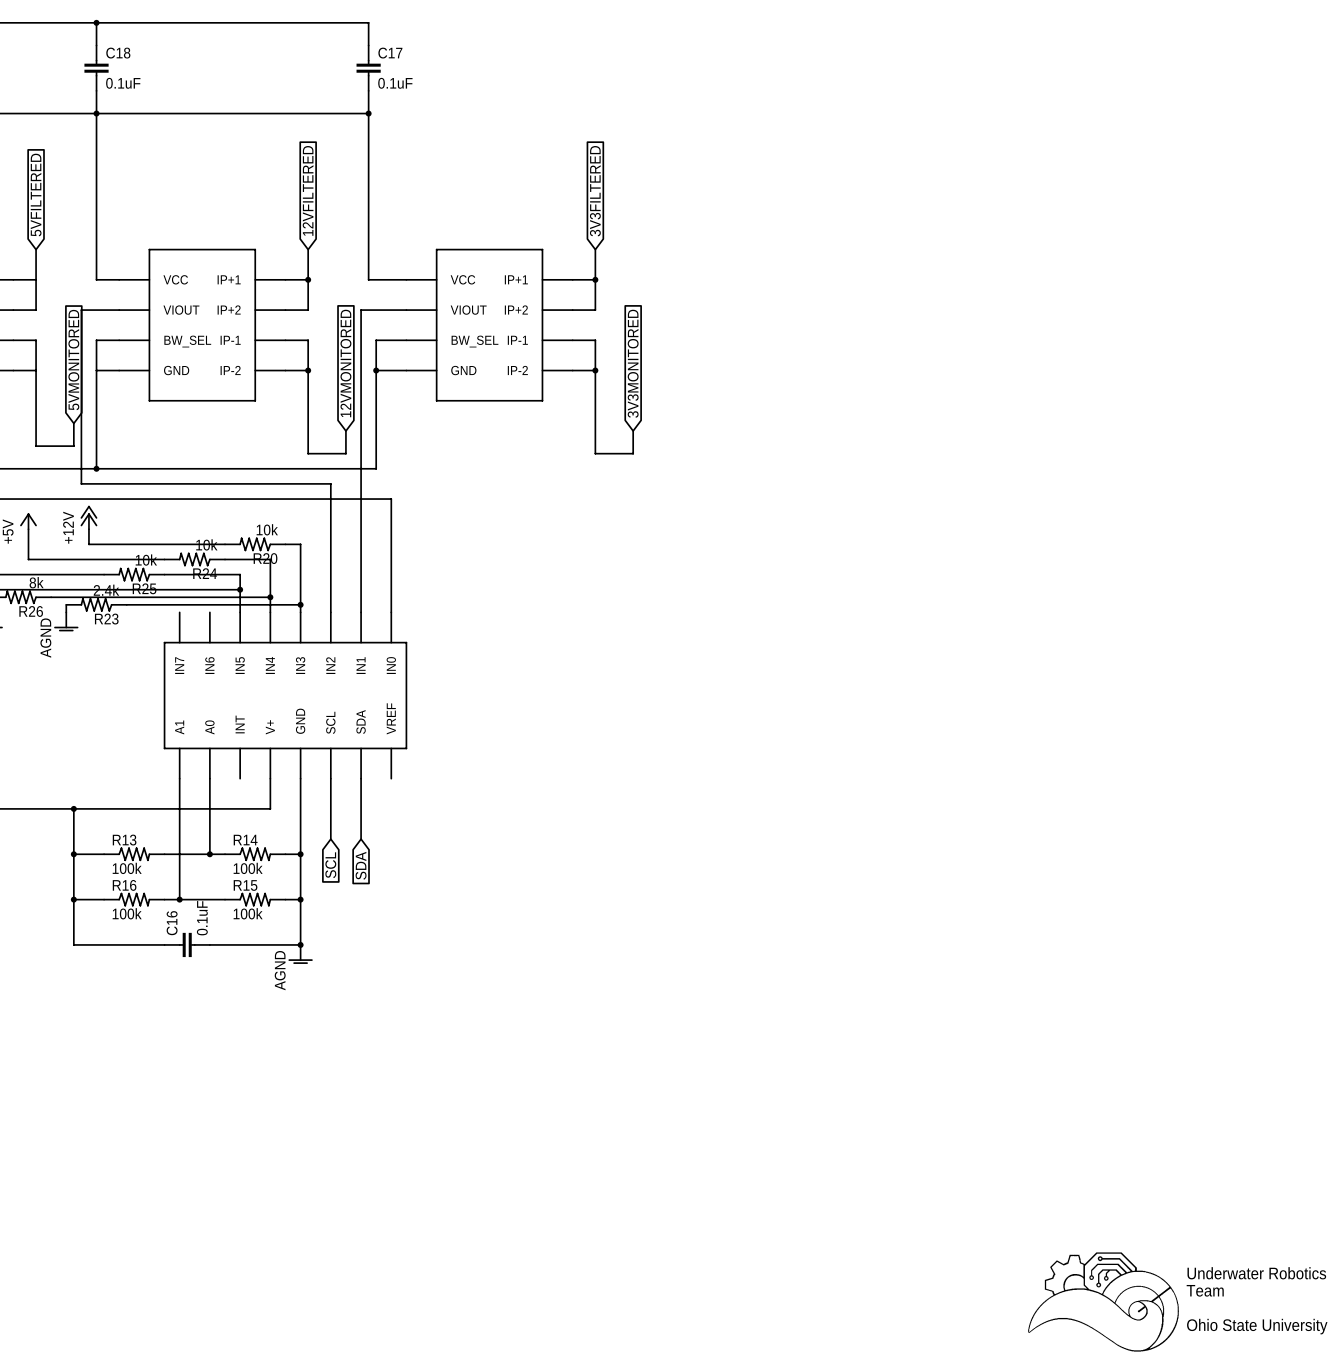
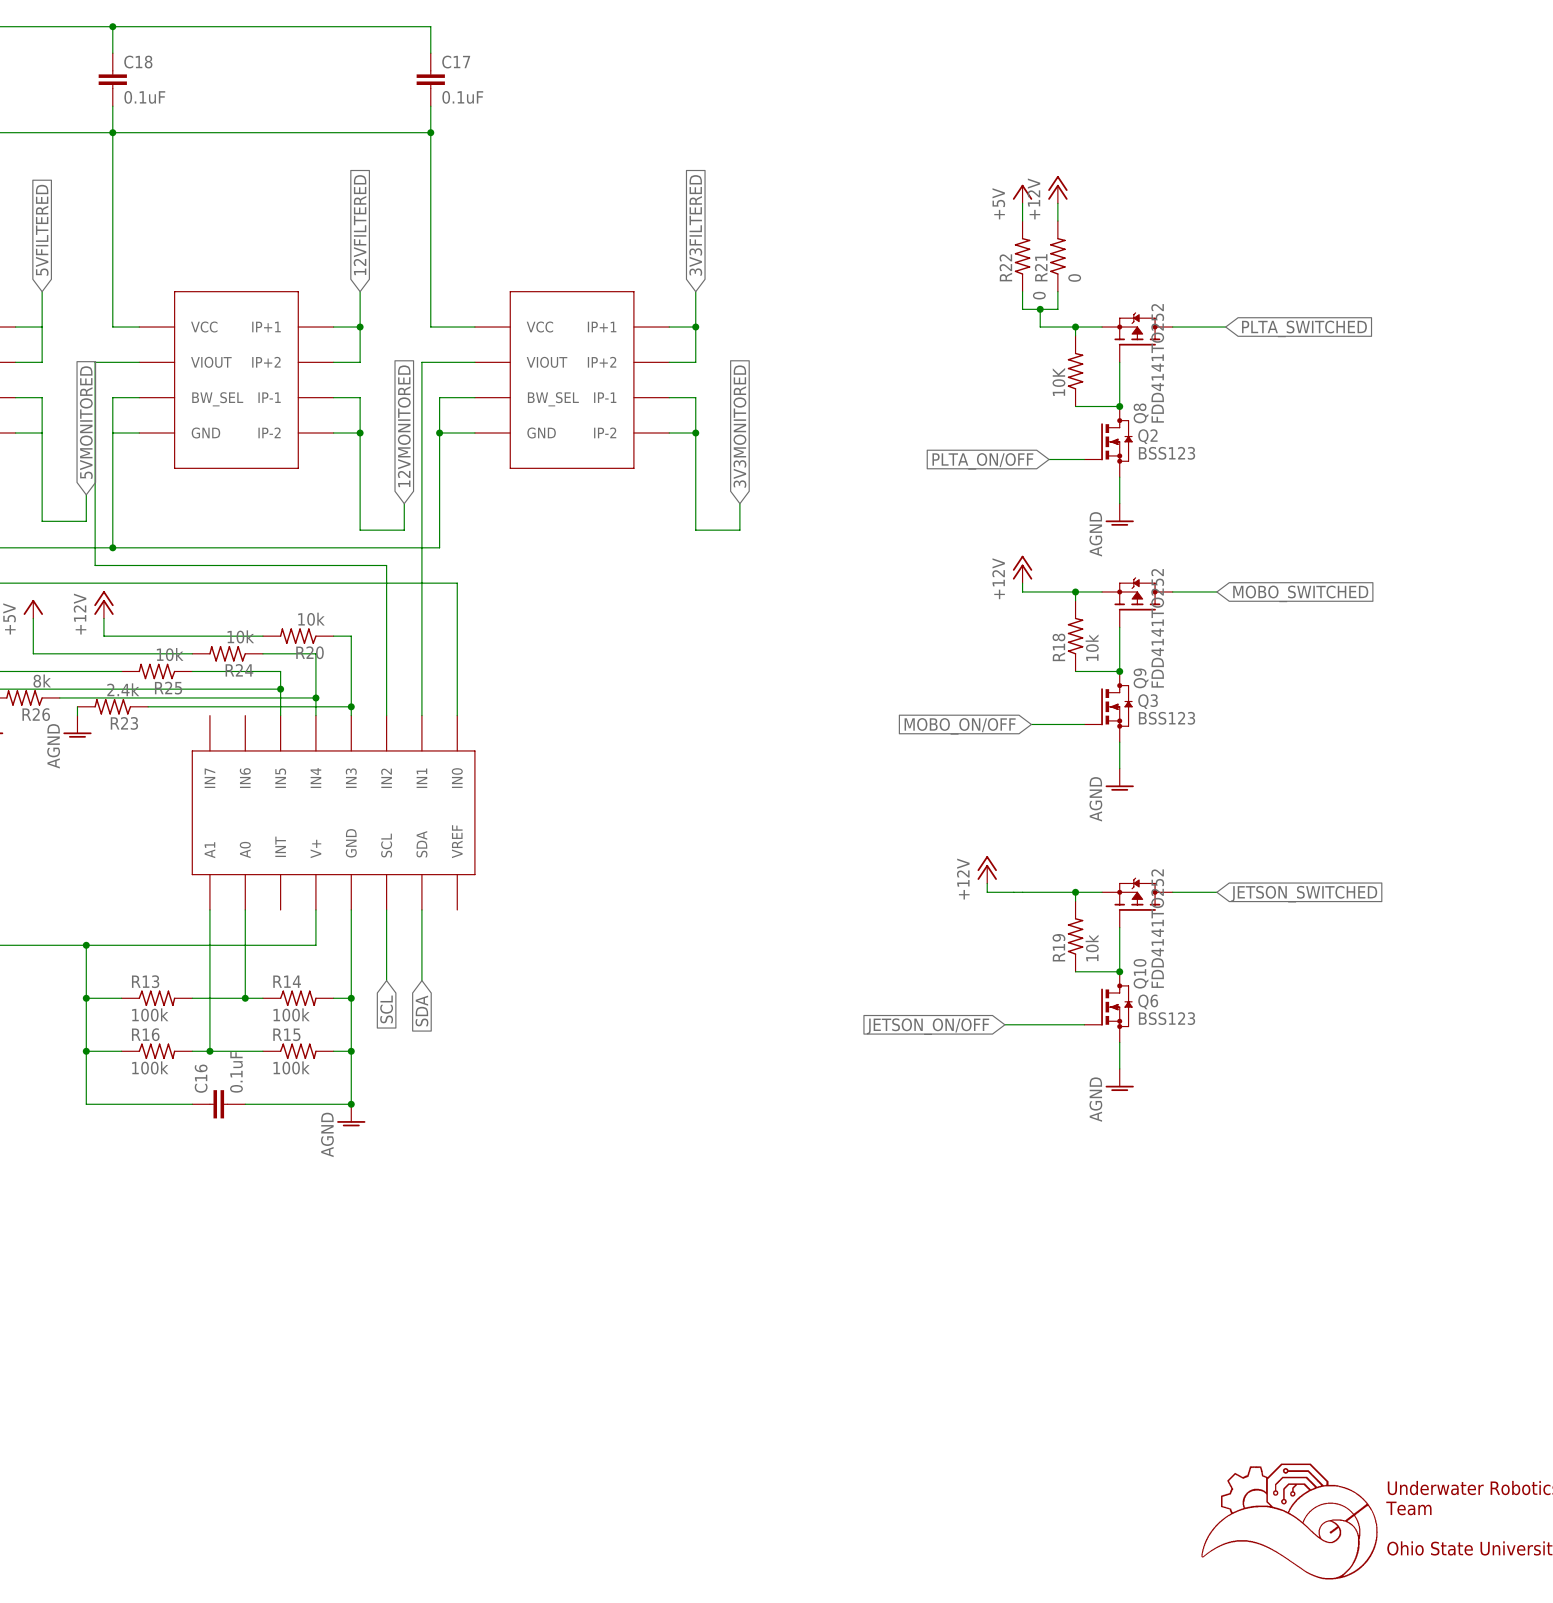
power symbol: none -> +12V (1057, 189)
power symbol: none -> +5V (1022, 194)
wire: none -> (1022, 203) (1022, 221)
wire: none -> (1057, 203) (1057, 221)
R22: none -> 0 (1022, 256)
R21: none -> 0 (1057, 256)
wire: none -> (1022, 291) (1022, 309) (1057, 309) (1057, 291)
wire: none -> (1040, 309) (1040, 327) (1102, 327)
junction: none -> (1040, 309)
wire: none -> (1075, 327) (1075, 335)
junction: none -> (1075, 327)
wire: none -> (1172, 327) (1225, 327)
global label: none -> PLTA_SWITCHED (1304, 328)
Q8: none -> FDD4141TO252 (1137, 337)
wire: none -> (1119, 362) (1119, 406) (1075, 406)
10K: none -> (1075, 371)
junction: none -> (1119, 406)
Q2: none -> BSS123 (1108, 441)
wire: none -> (1049, 459) (1084, 459)
global label: none -> PLTA_ON/OFF (982, 461)
wire: none -> (1119, 477) (1119, 503)
power symbol: none -> AGND (1119, 514)
power symbol: none -> +12V (1022, 569)
wire: none -> (1022, 583) (1022, 591) (1102, 591)
wire: none -> (1075, 591) (1075, 600)
junction: none -> (1075, 591)
wire: none -> (1172, 591) (1216, 591)
global label: none -> MOBO_SWITCHED (1300, 593)
Q9: none -> FDD4141TO252 (1137, 602)
wire: none -> (1119, 627) (1119, 671) (1075, 671)
R18: none -> 10k (1075, 636)
junction: none -> (1119, 671)
Q3: none -> BSS123 (1108, 706)
wire: none -> (1031, 724) (1084, 724)
global label: none -> MOBO_ON/OFF (960, 726)
wire: none -> (1119, 742) (1119, 768)
power symbol: none -> AGND (1119, 779)
power symbol: none -> +12V (987, 869)
wire: none -> (987, 883) (987, 892) (1102, 892)
wire: none -> (1075, 892) (1075, 901)
junction: none -> (1075, 892)
wire: none -> (1172, 892) (1216, 892)
global label: none -> JETSON_SWITCHED (1304, 894)
Q10: none -> FDD4141TO252 (1137, 902)
wire: none -> (1119, 927) (1119, 971) (1075, 971)
R19: none -> 10k (1075, 936)
junction: none -> (1119, 971)
Q6: none -> BSS123 (1108, 1007)
wire: none -> (1004, 1024) (1084, 1024)
global label: none -> JETSON_ON/OFF (928, 1026)
wire: none -> (1119, 1042) (1119, 1068)
power symbol: none -> AGND (1119, 1079)

